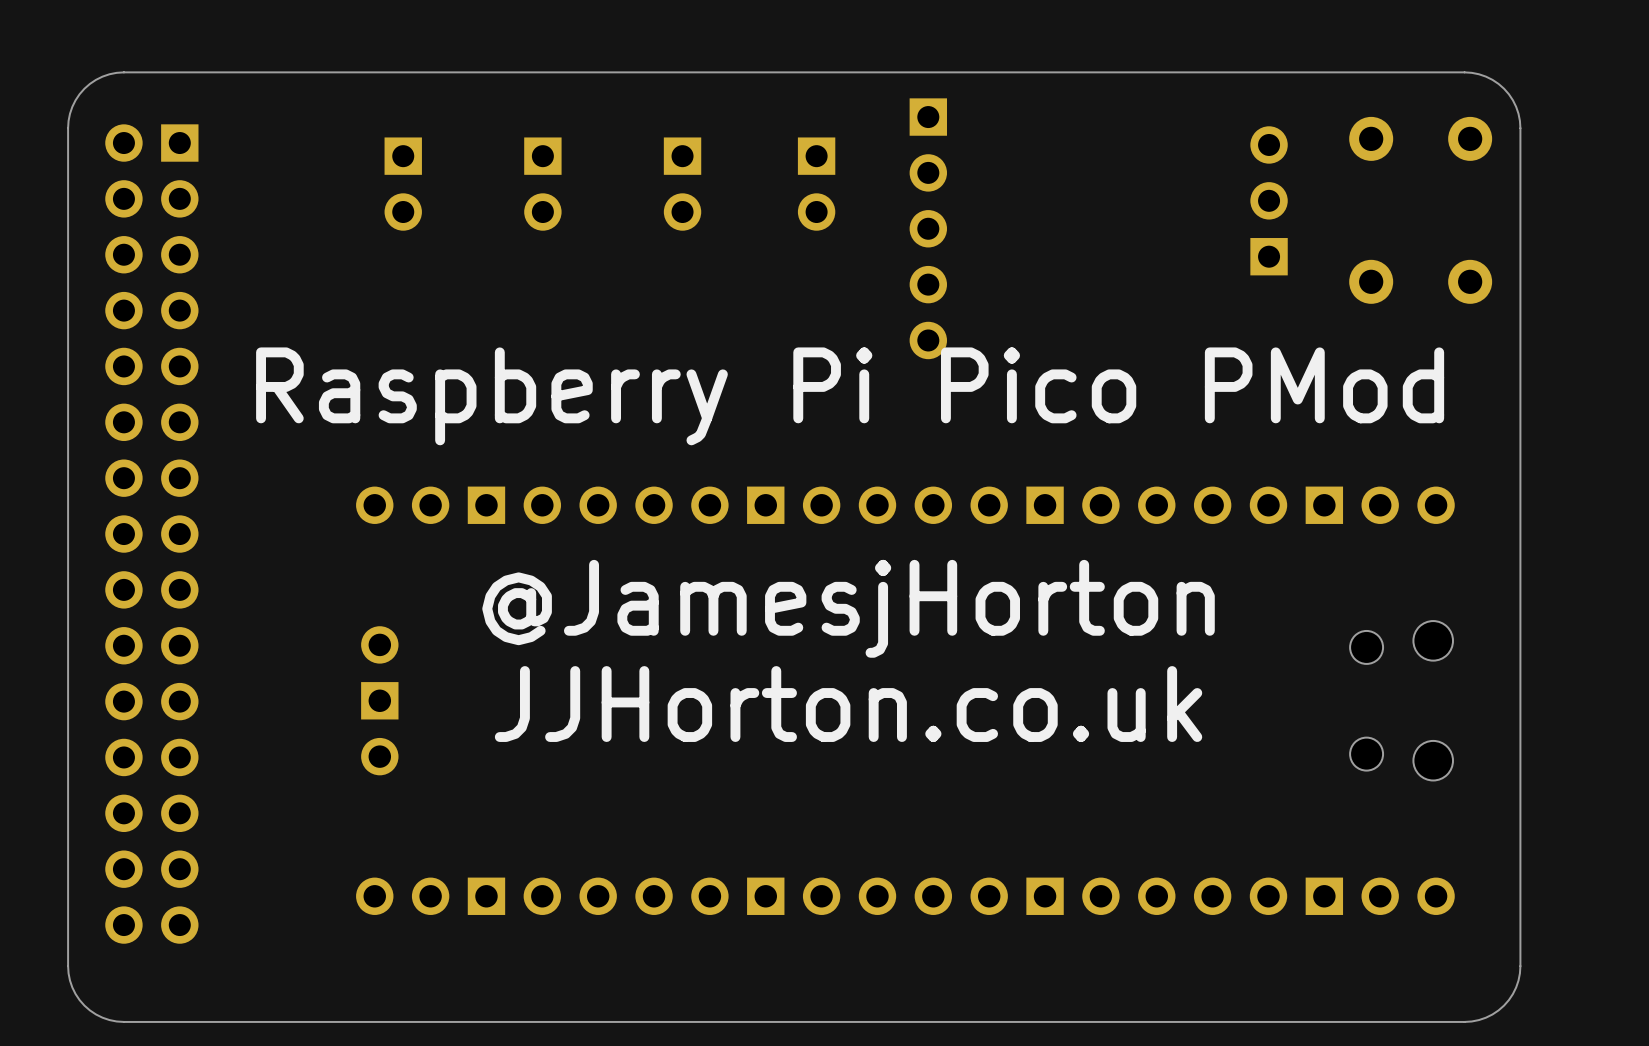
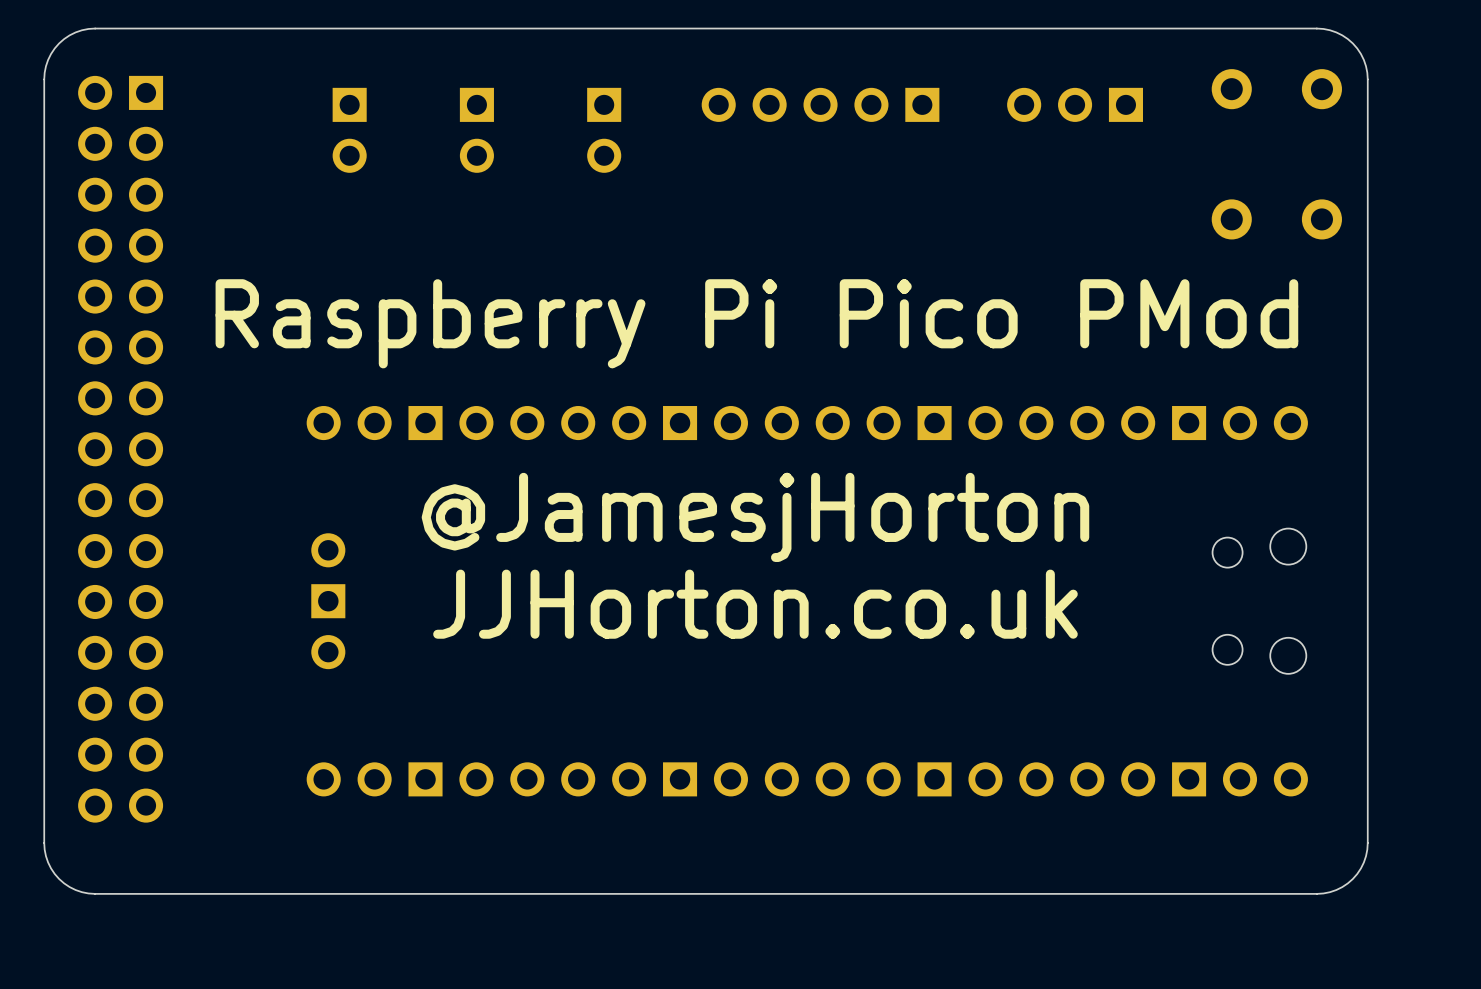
part: (816, 184) -> none
part rotation: 0° (1269, 200) -> 90° counterclockwise (1075, 104)
part rotation: 0° (928, 228) -> 90° clockwise (820, 104)

